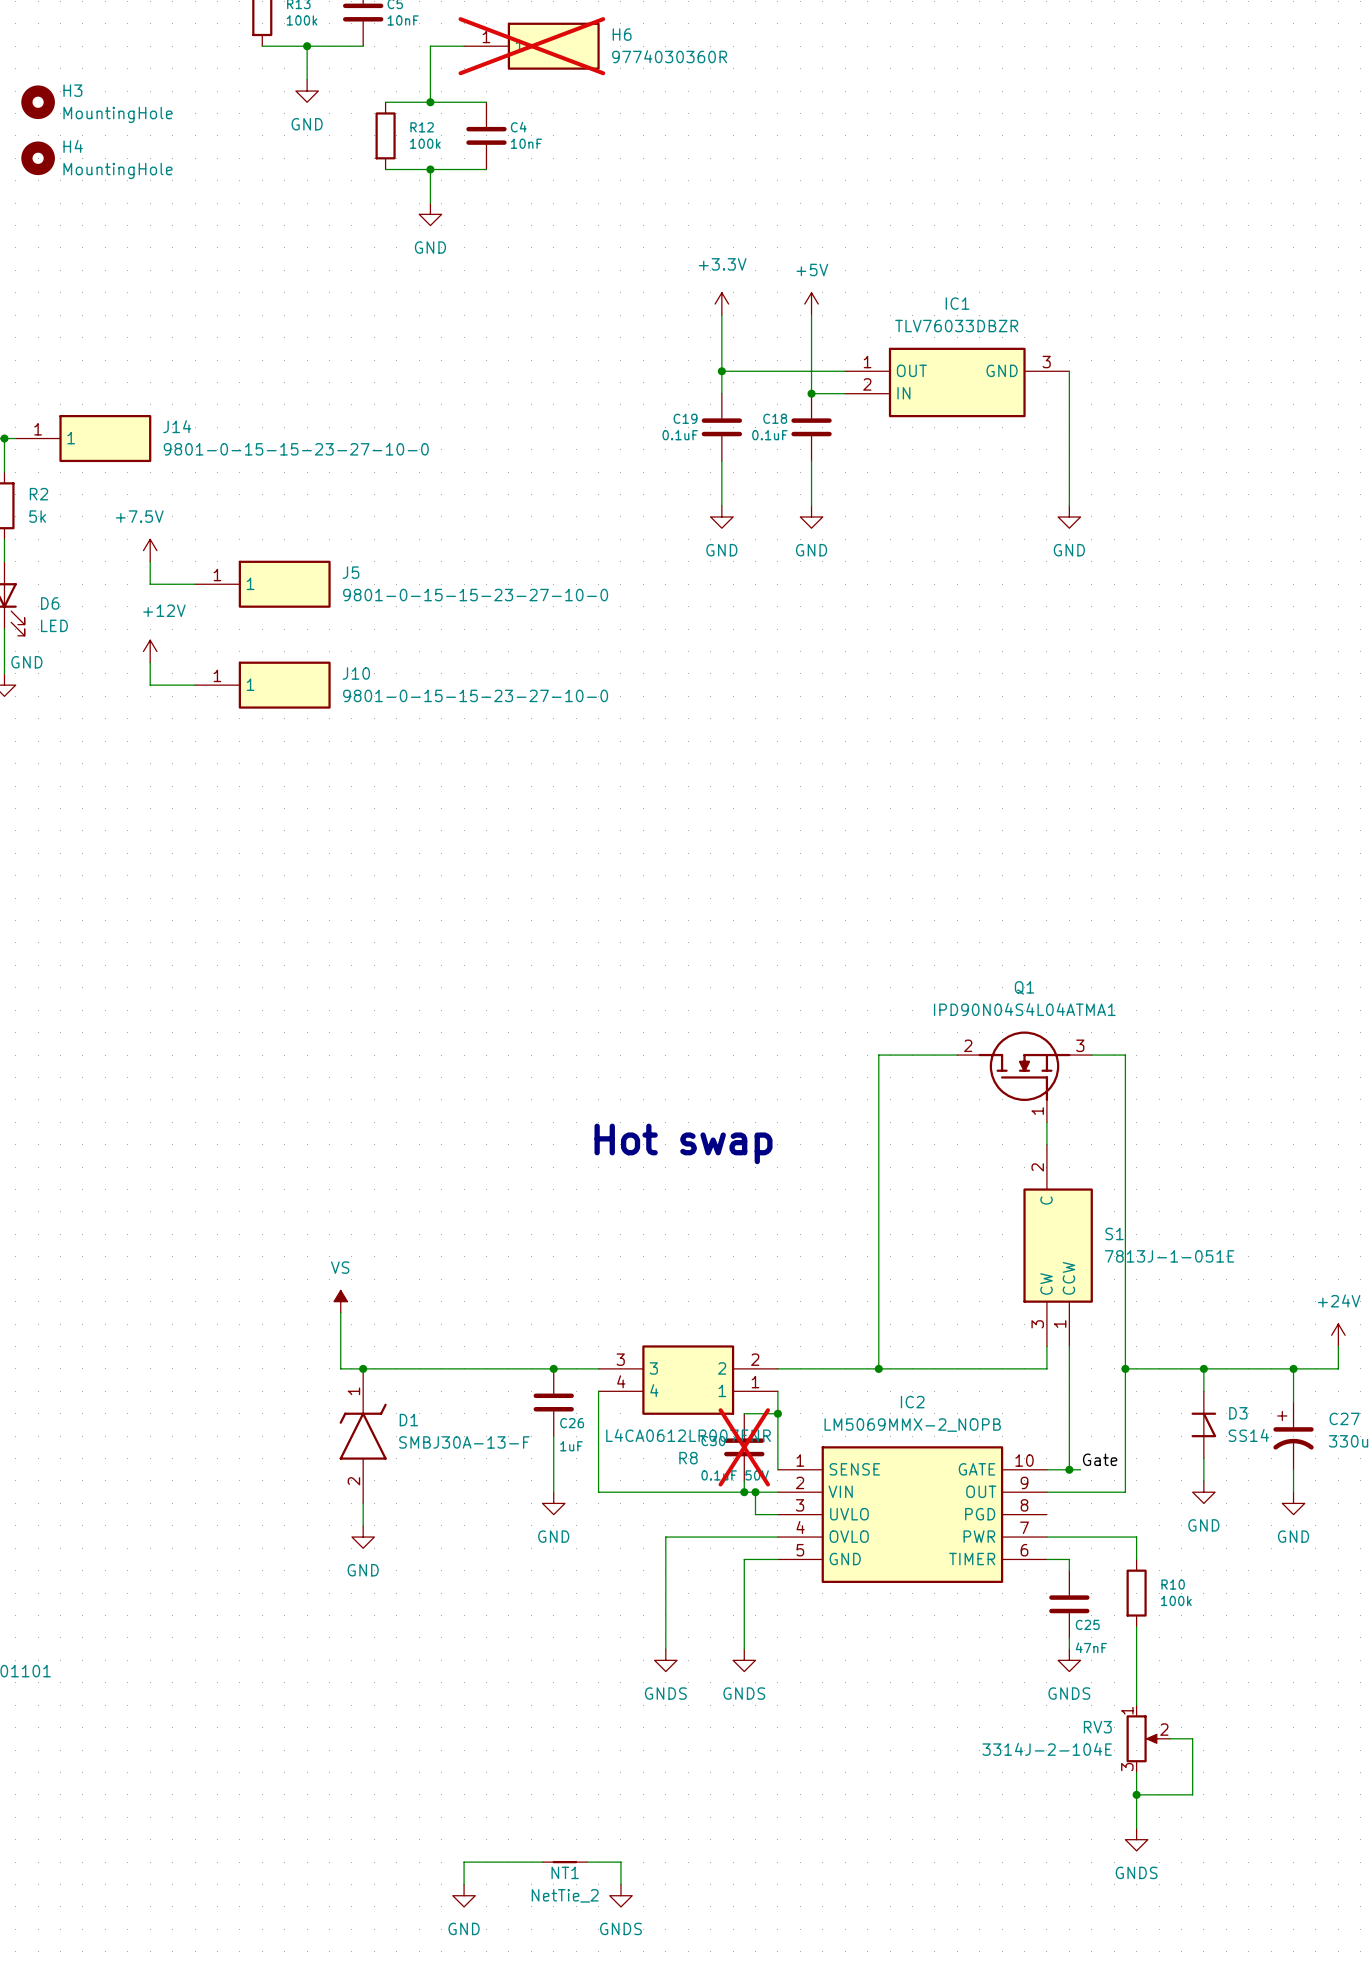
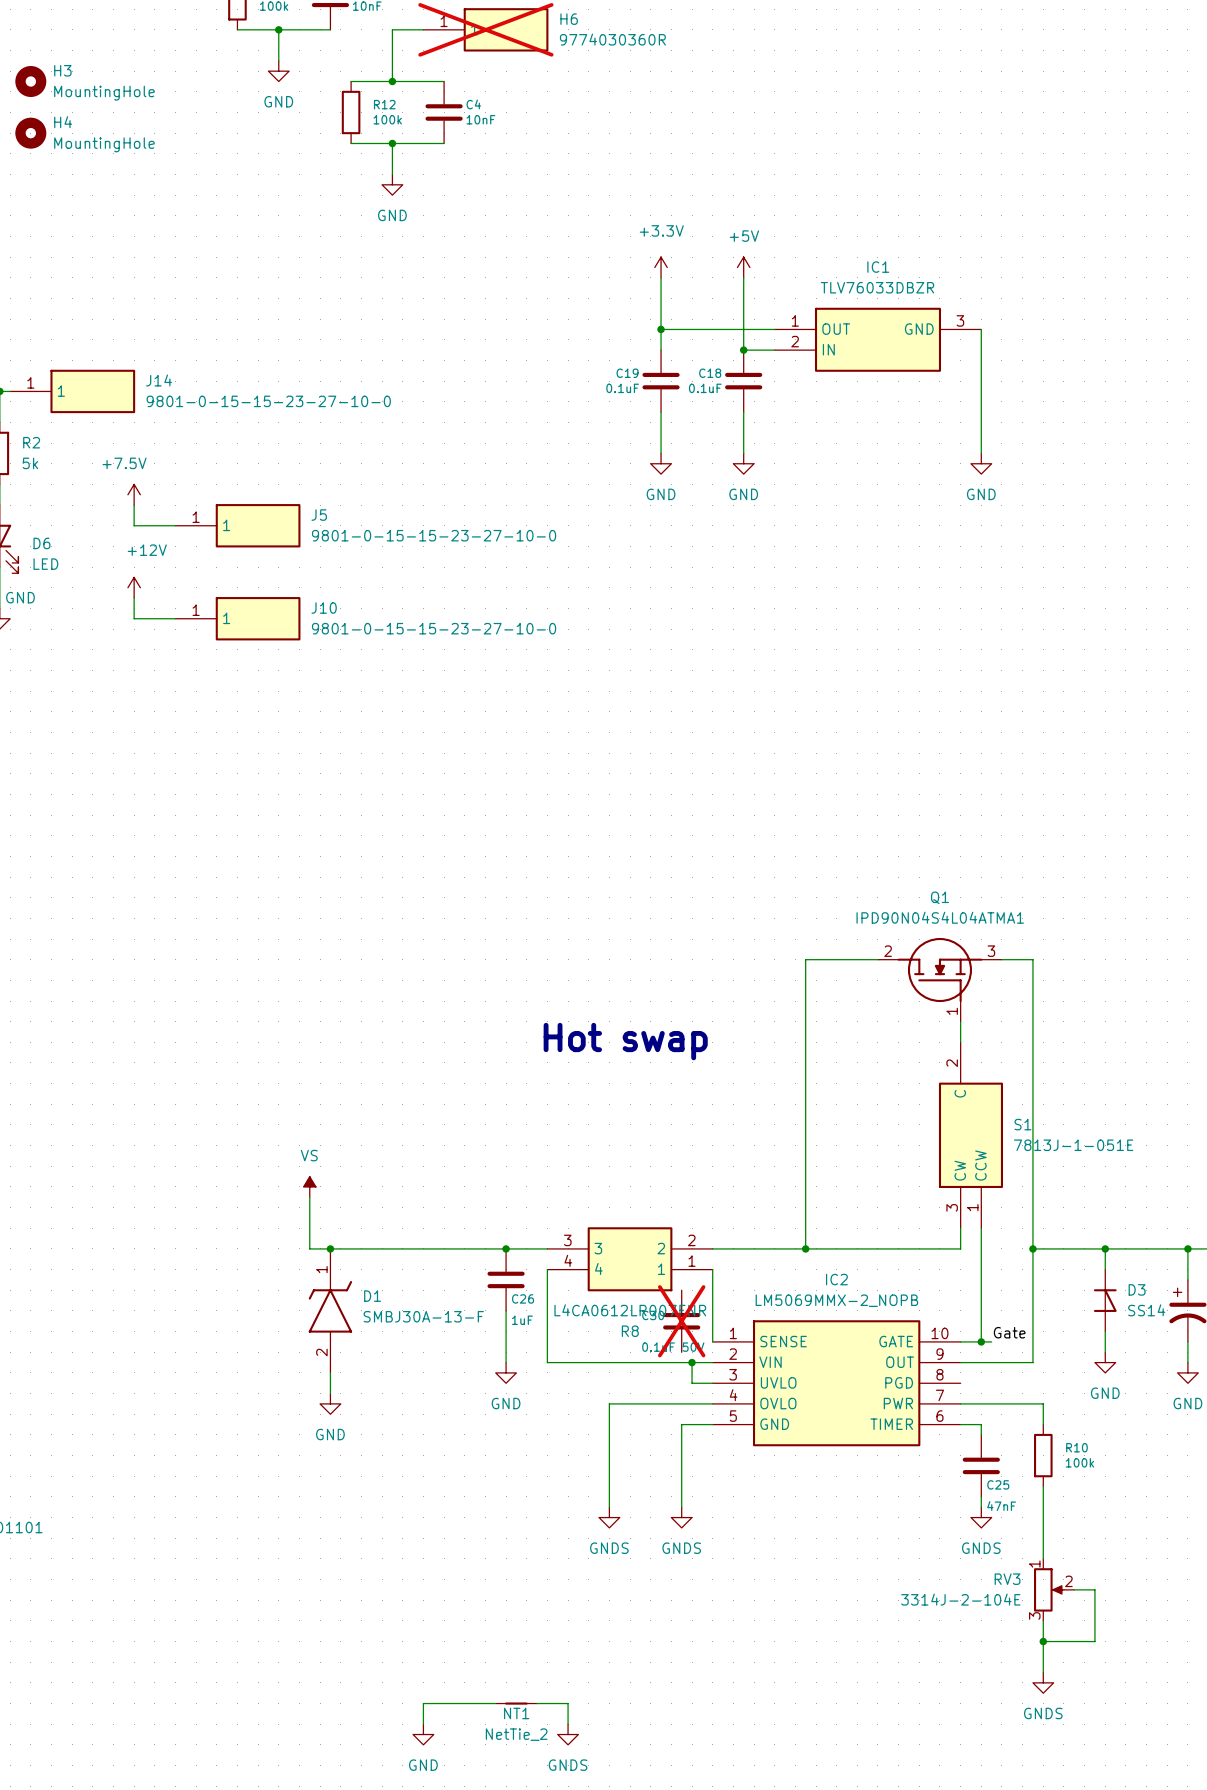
wire: (744, 1413) (777, 1413) -> none
junction: (777, 1413) -> none
wire: (744, 1480) (744, 1492) -> none
junction: (744, 1492) -> none

